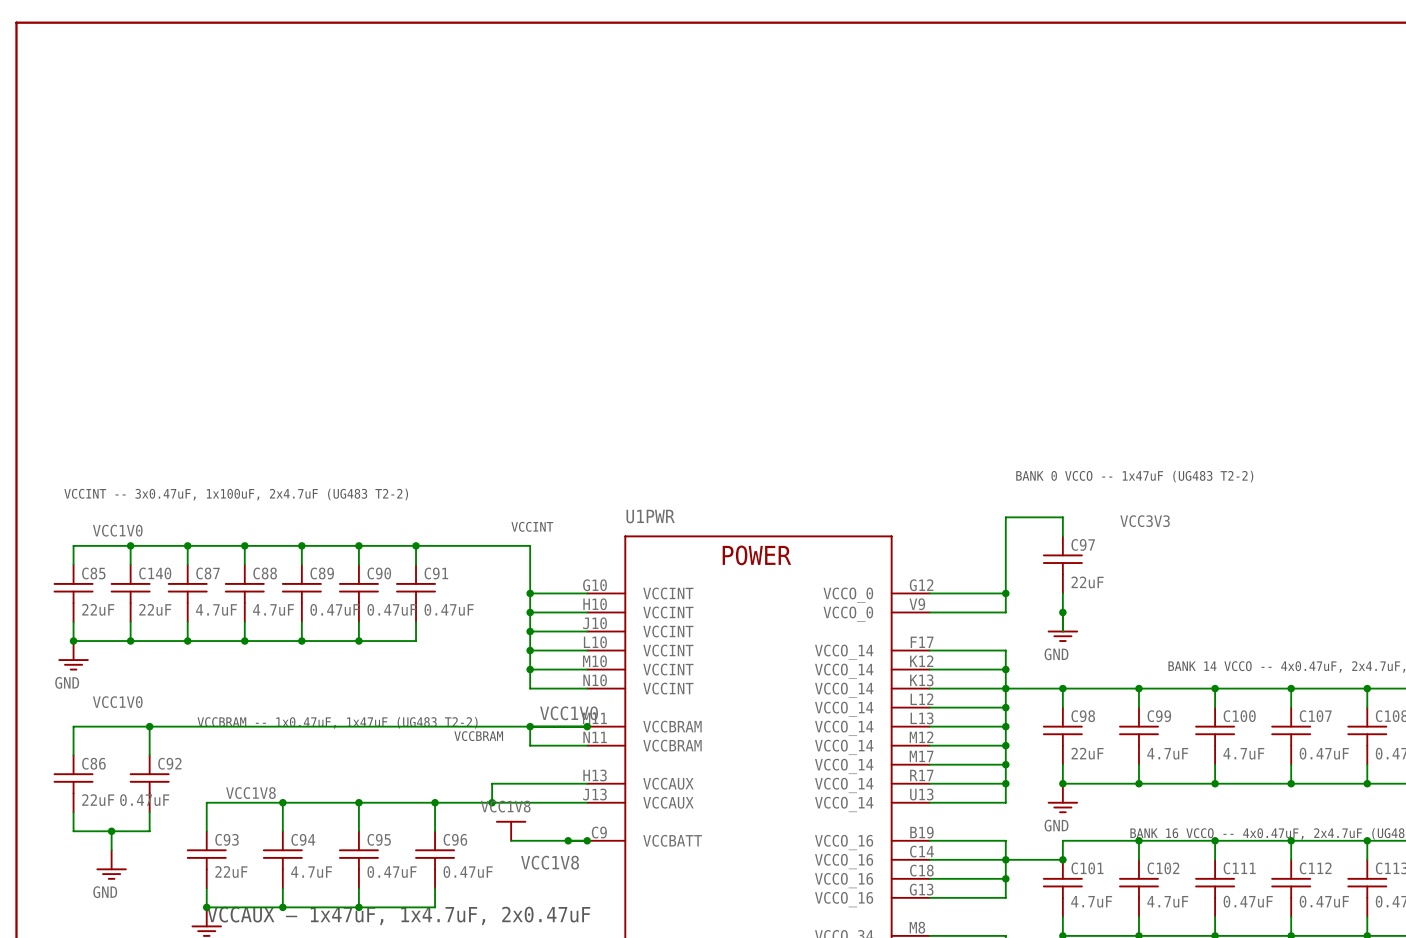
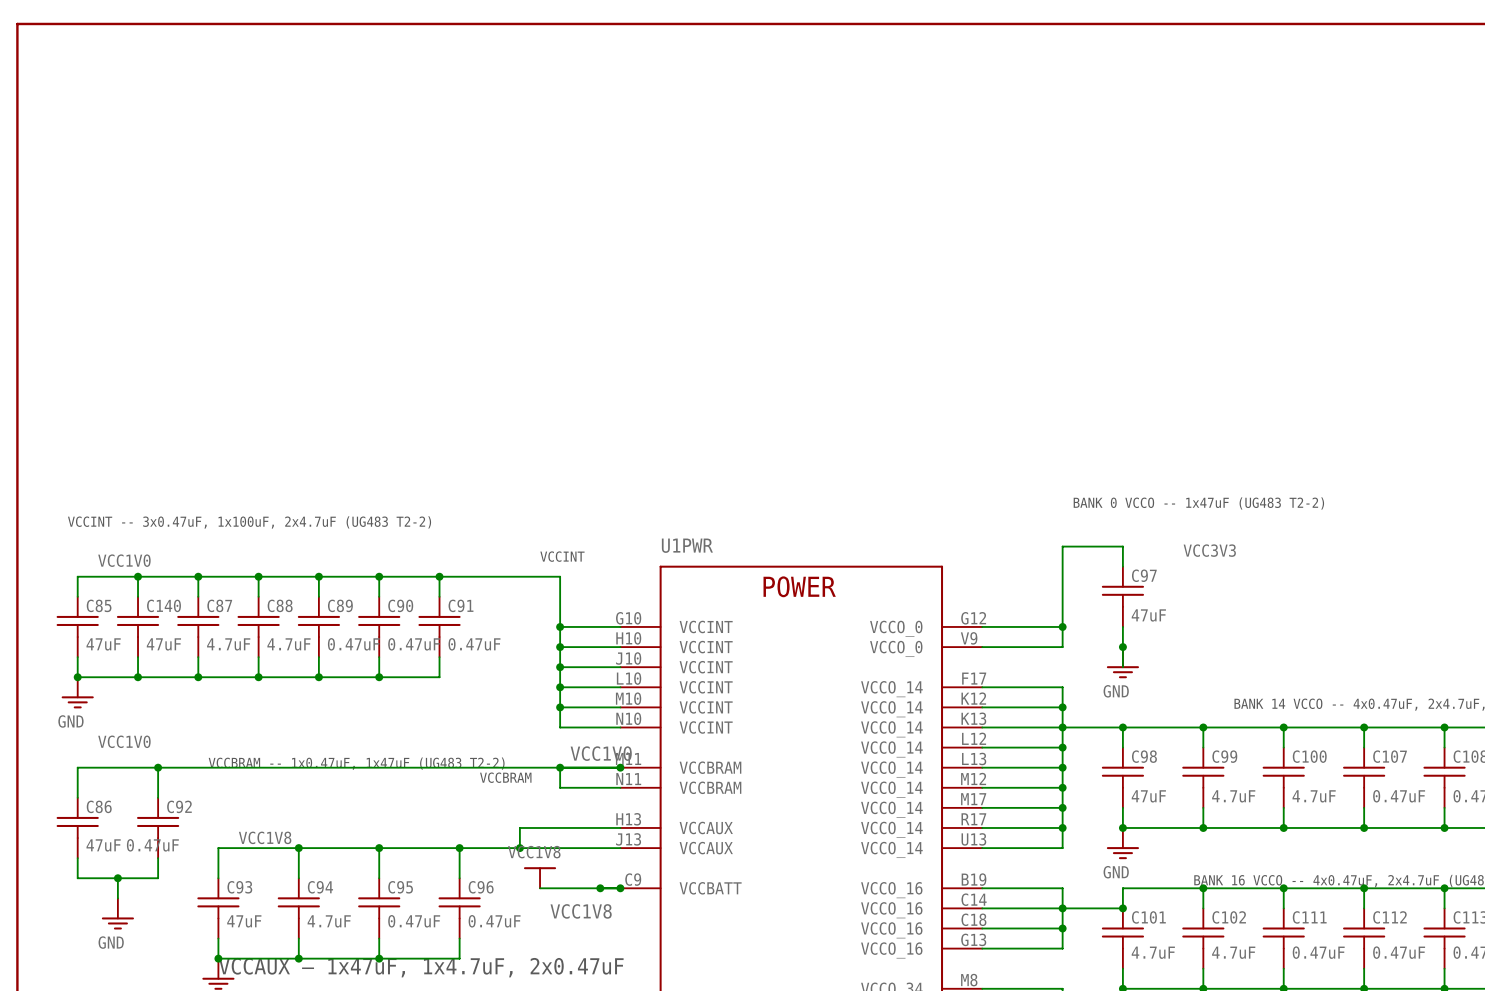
C97 value: 22uF (1087, 582) -> 47uF (1148, 615)
C85 value: 22uF (98, 609) -> 47uF (103, 644)
C140 value: 22uF (155, 609) -> 47uF (163, 644)
C98 value: 22uF (1087, 753) -> 47uF (1148, 796)
C86 value: 22uF (98, 800) -> 47uF (103, 845)
C93 value: 22uF (231, 872) -> 47uF (244, 921)

